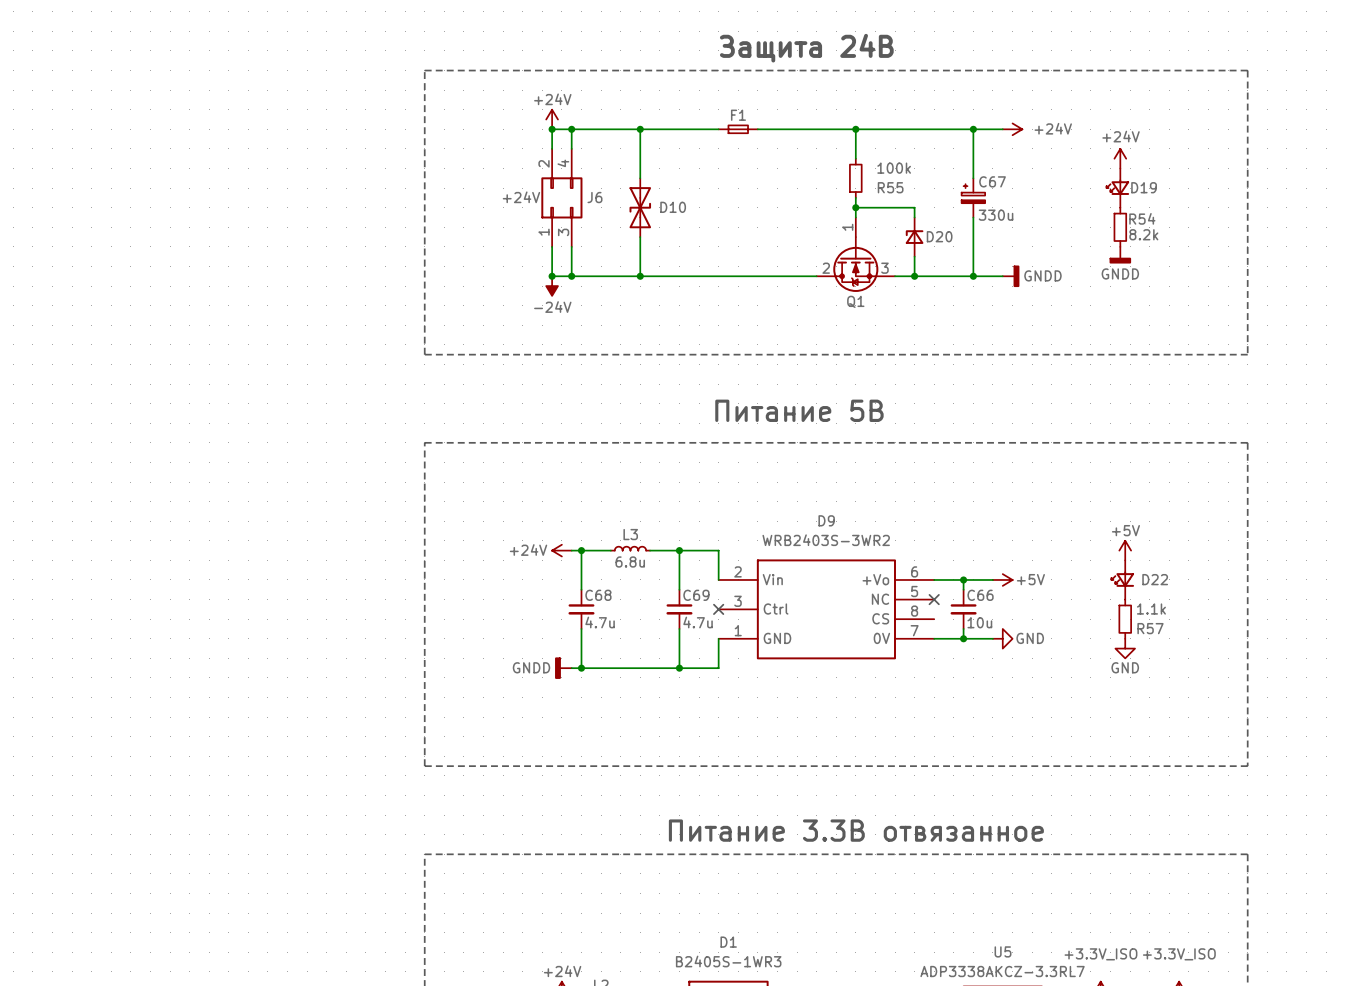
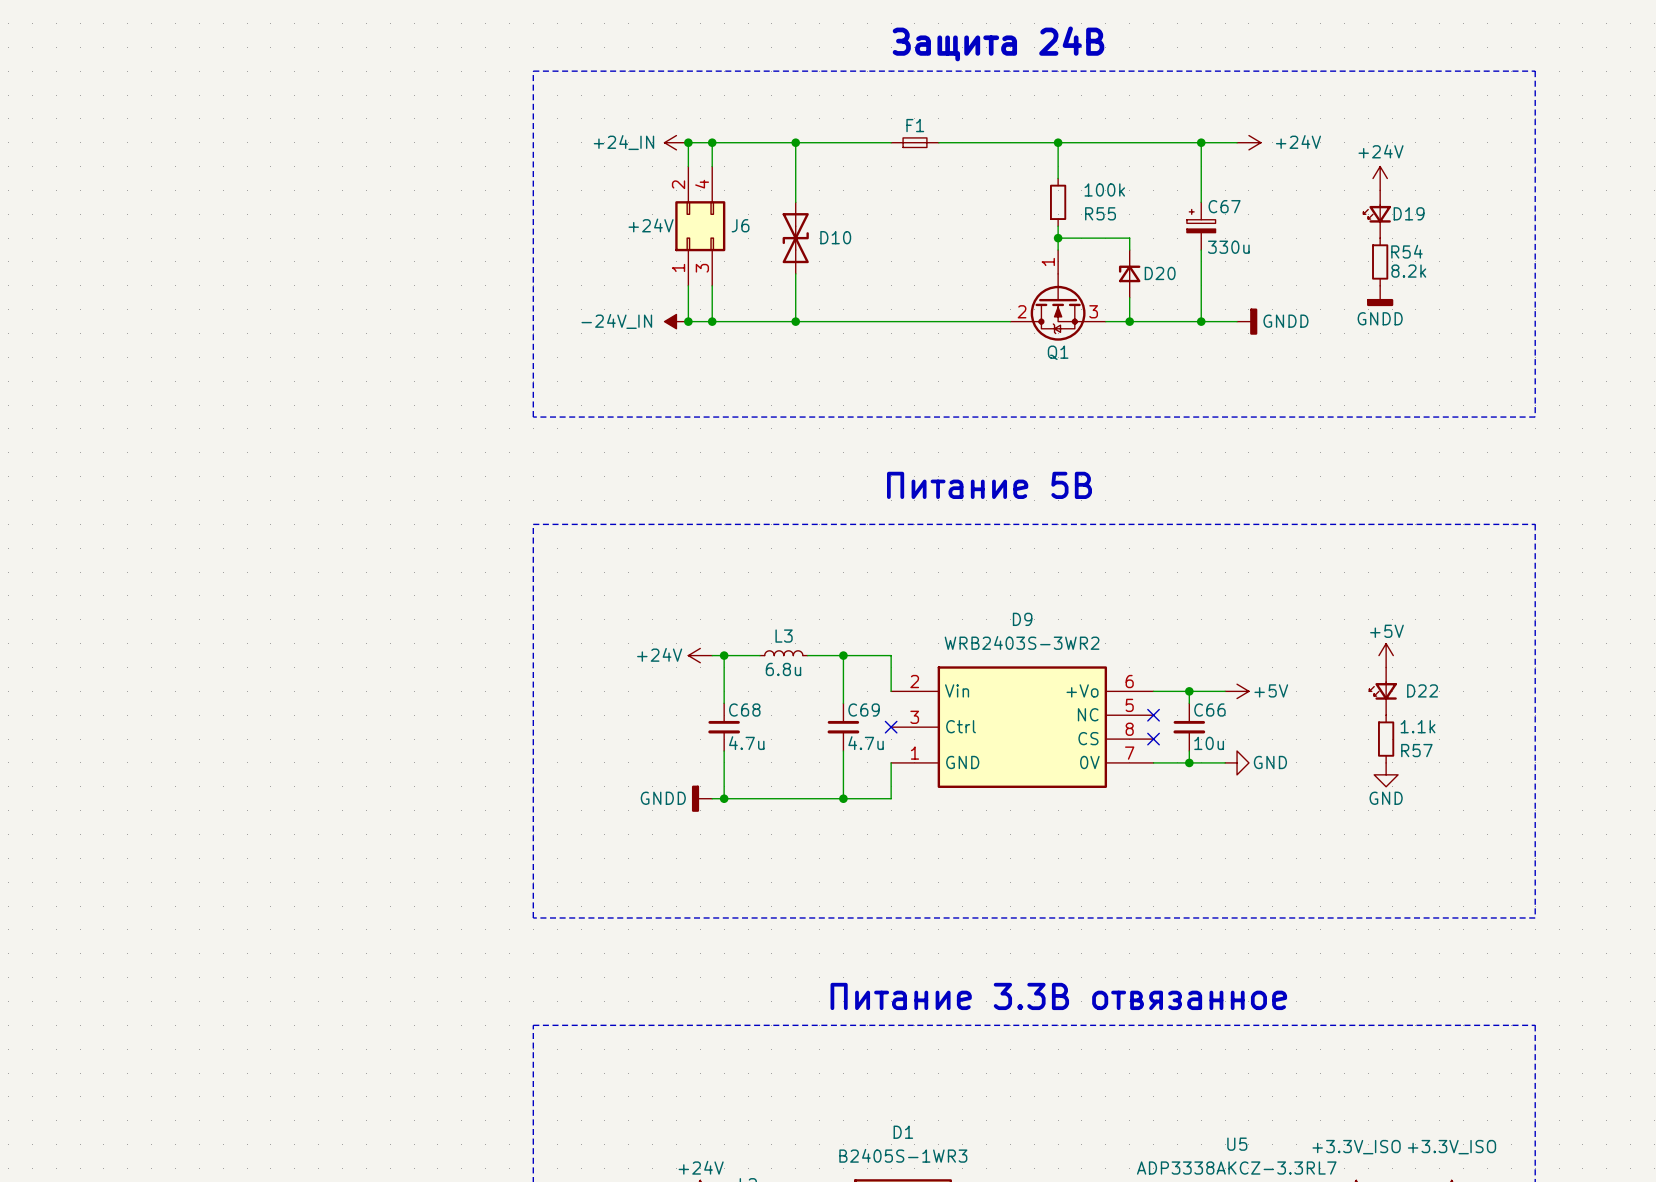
power symbol: +24V (552, 119) -> none
power symbol: none -> +24_IN (676, 142)
power symbol: none -> -24V_IN (676, 321)
power symbol: -24V (552, 286) -> none
no-connect mark: none -> (1153, 739)

